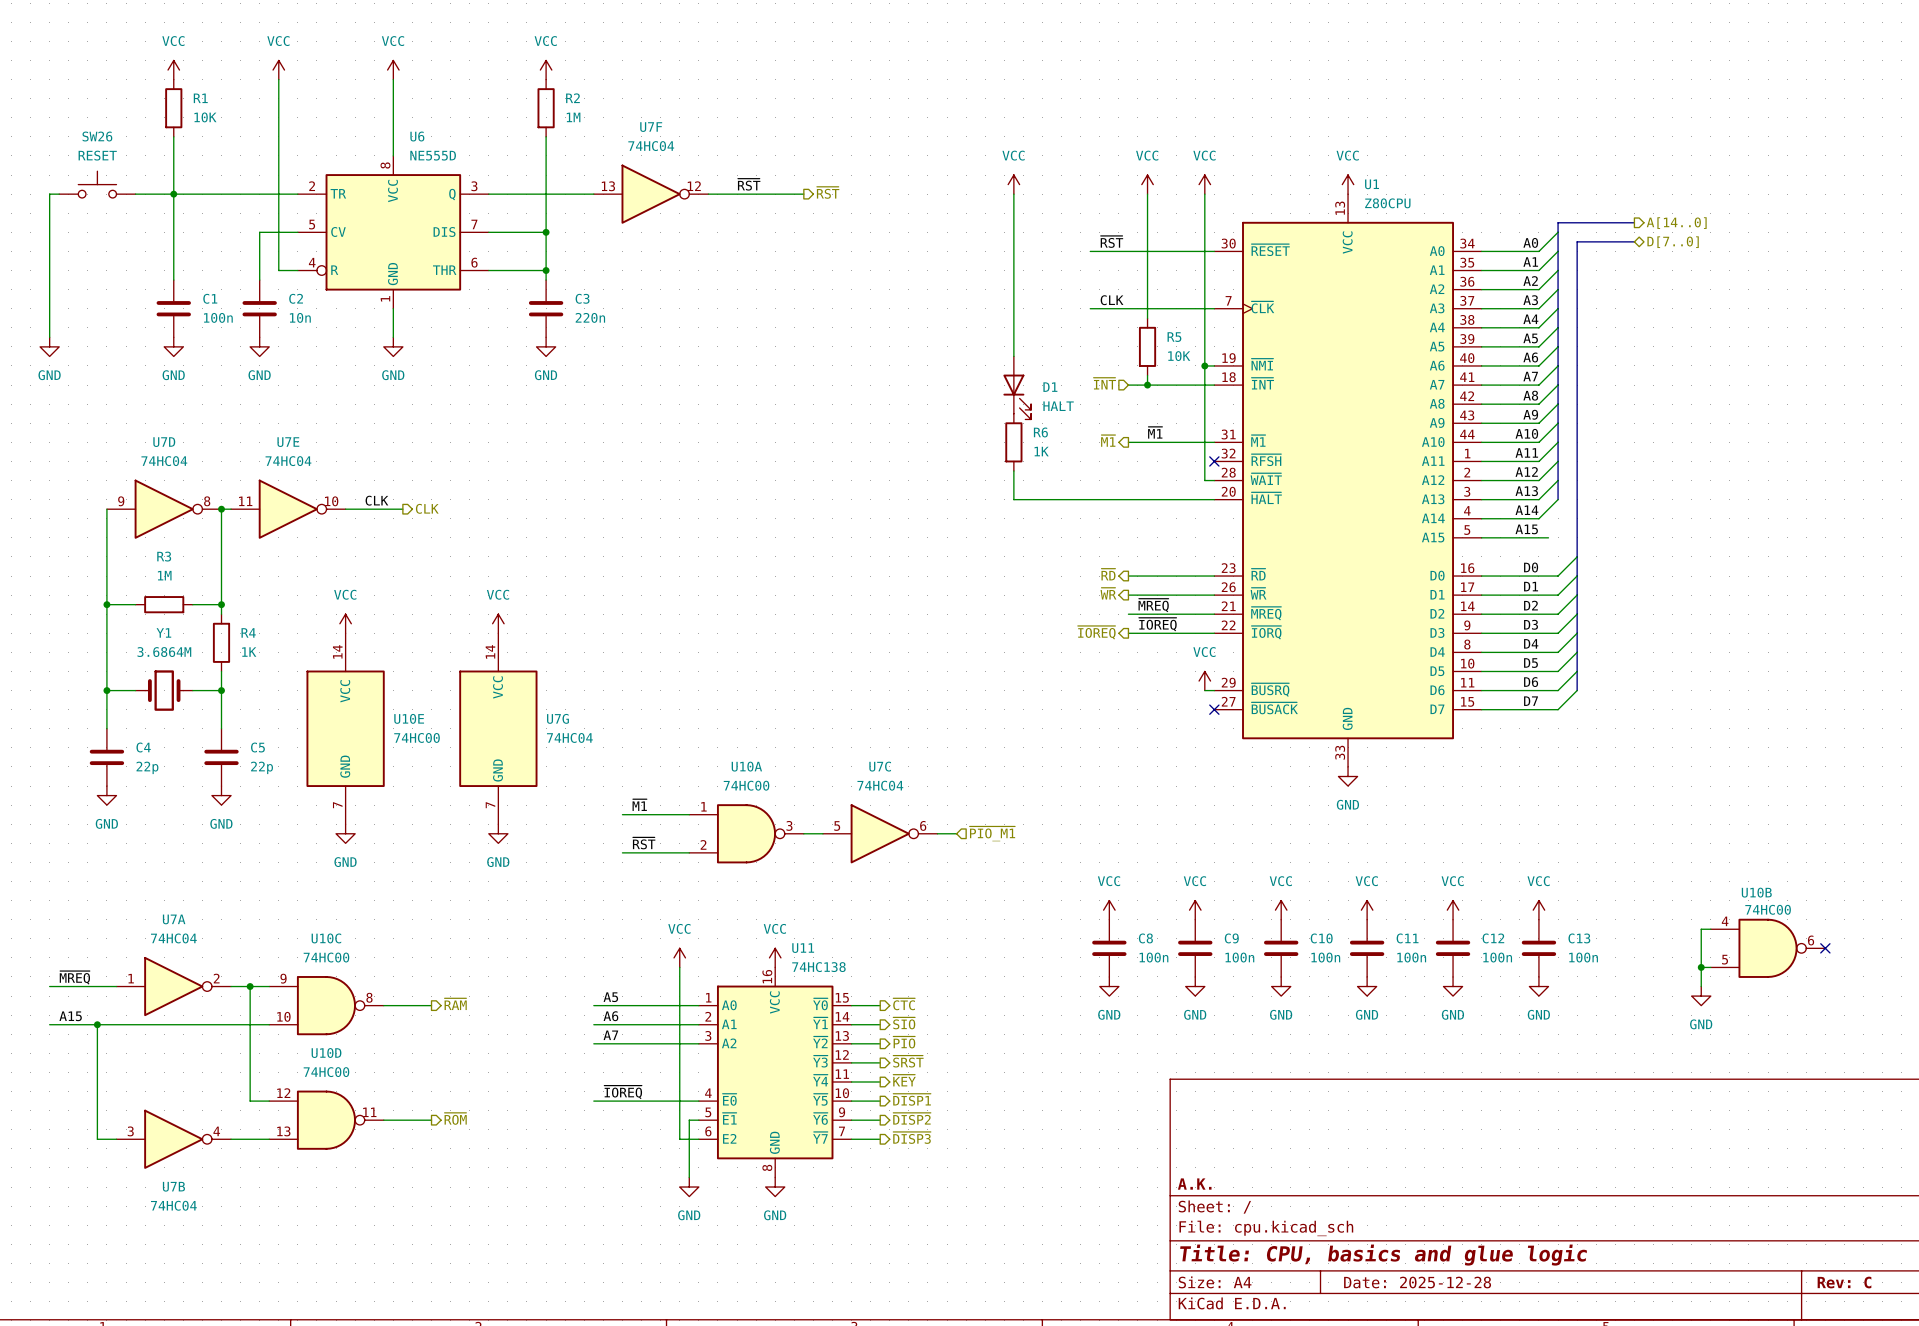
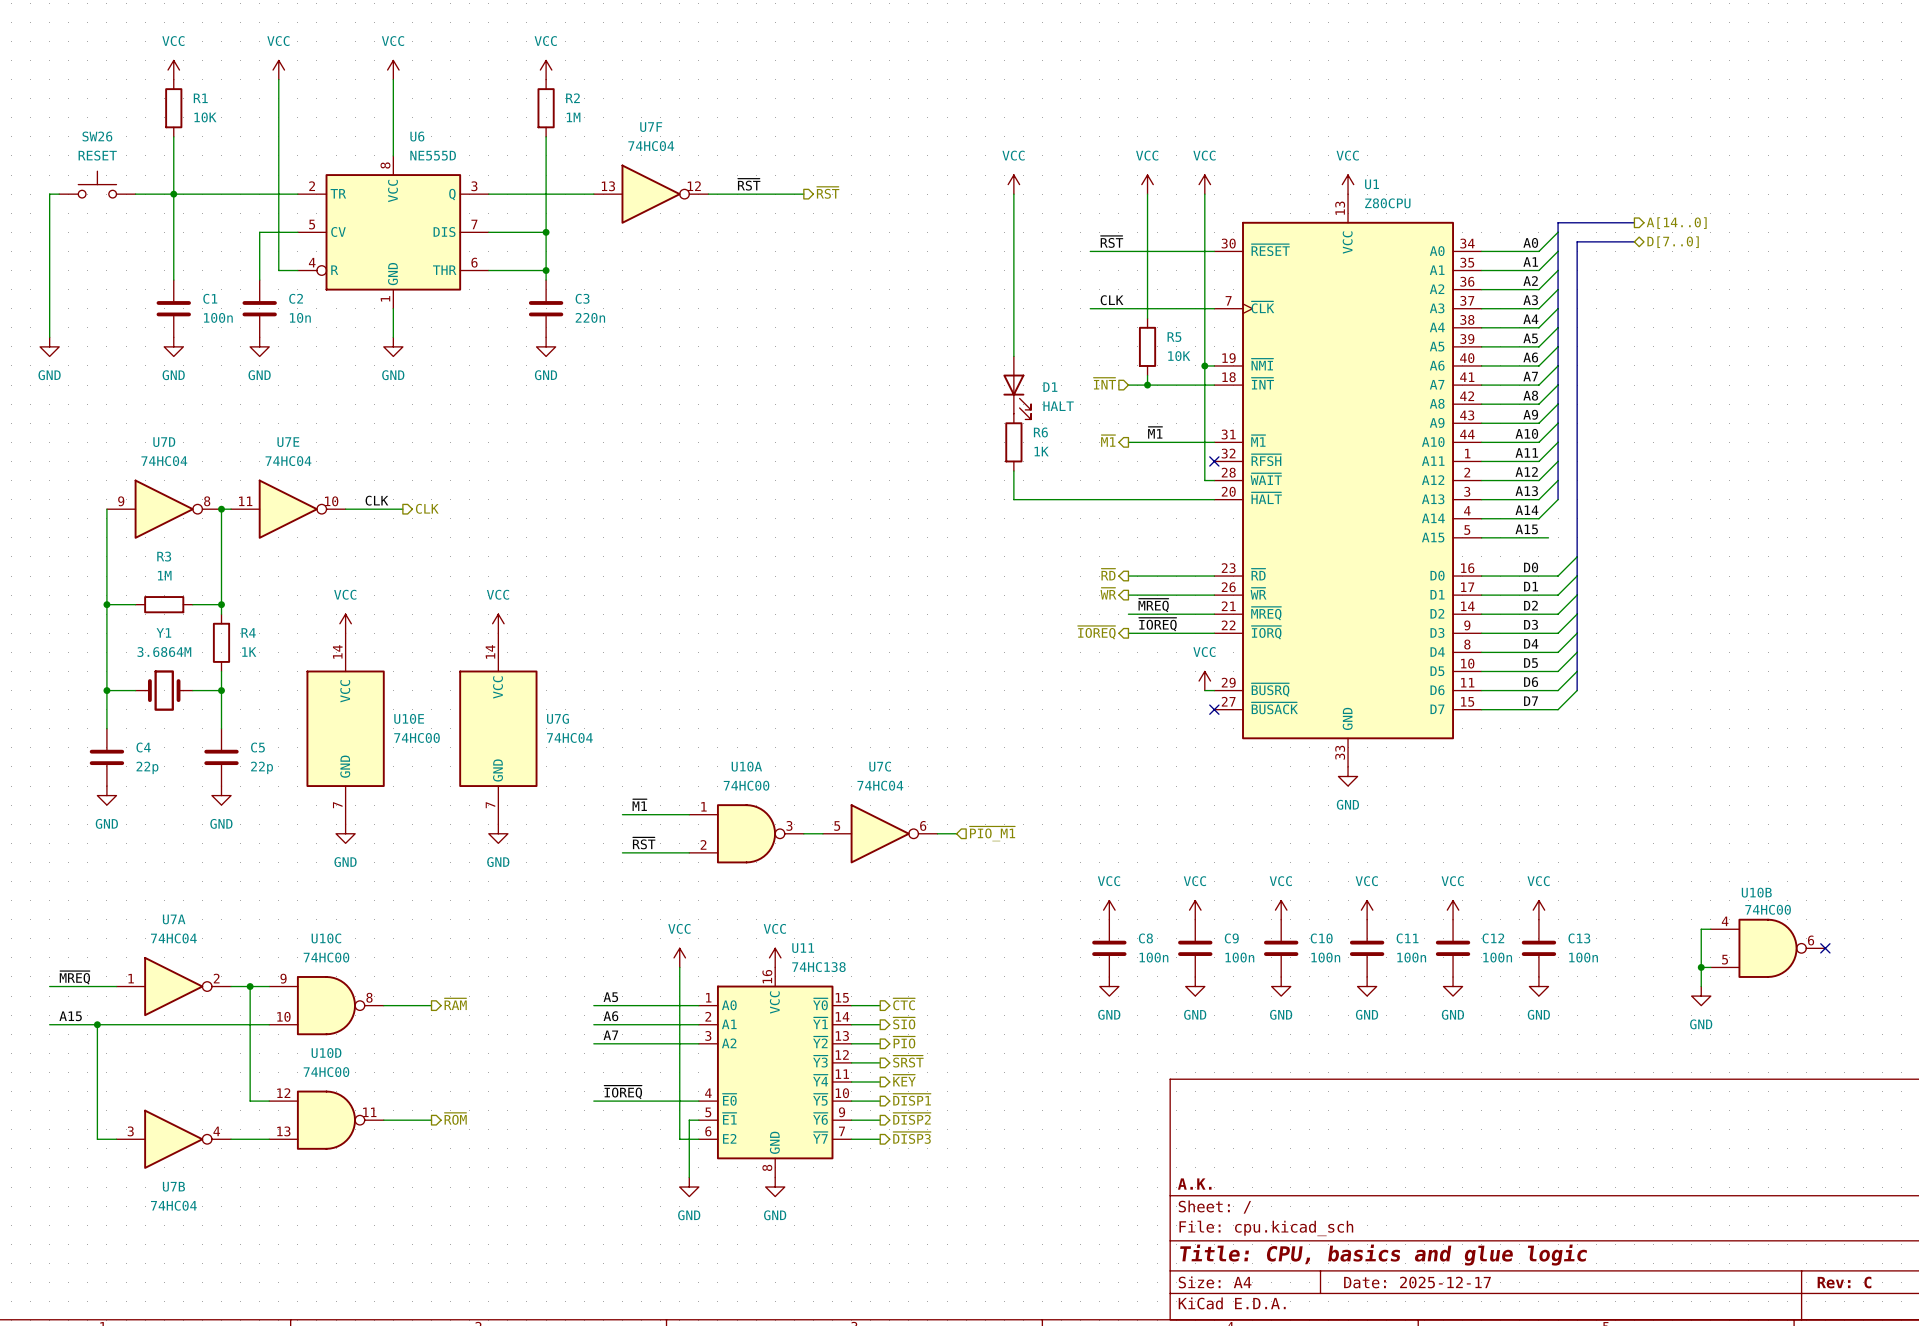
title block: Date: 2025-12-28 (1417, 1282) -> Date: 2025-12-17 (1417, 1282)

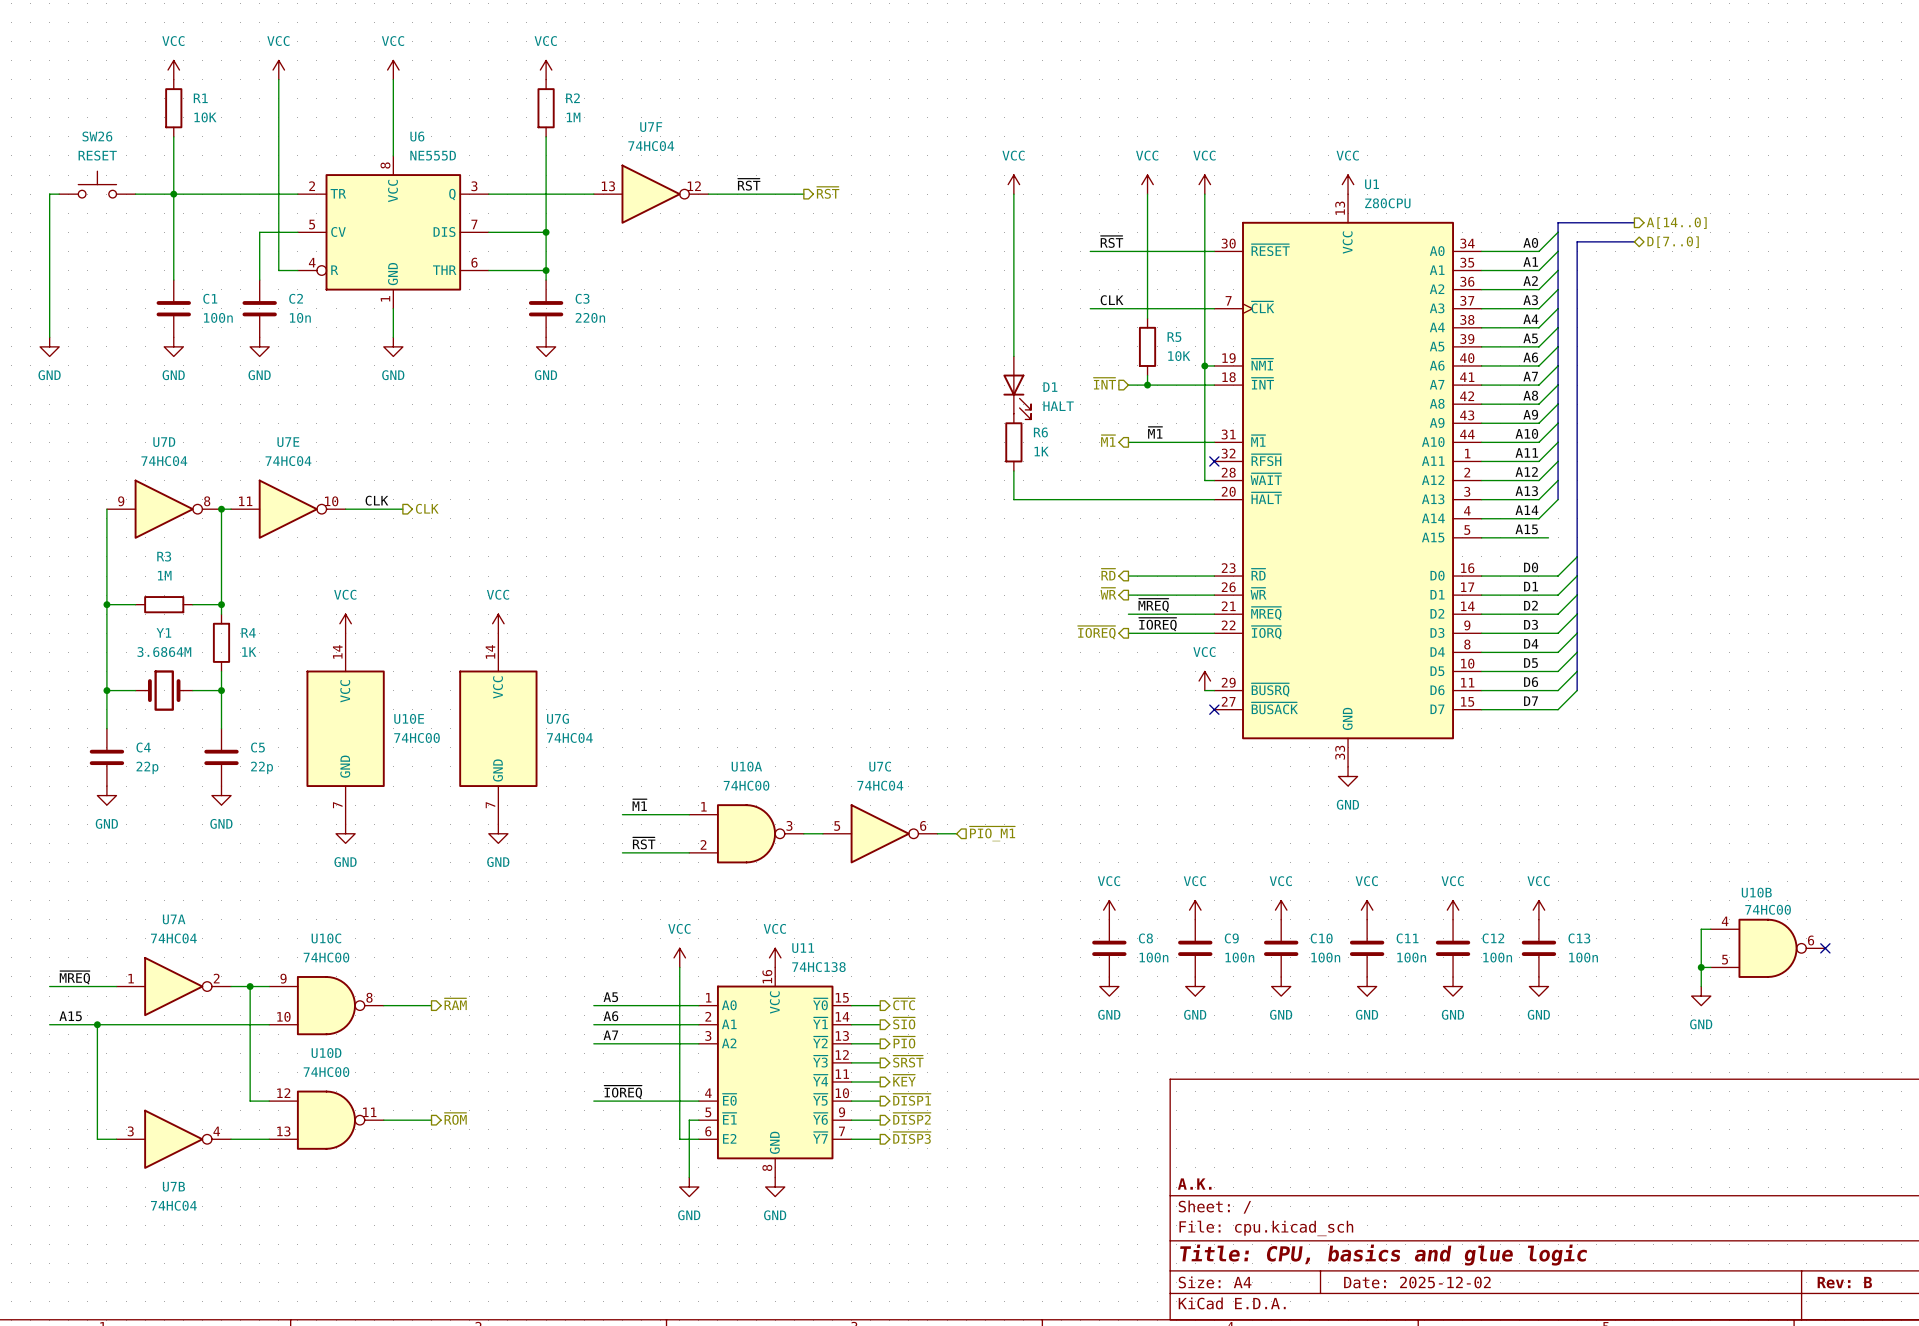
title block: Date: 2025-12-17 (1417, 1282) -> Date: 2025-12-02 (1417, 1282)
title block: Rev: C (1844, 1282) -> Rev: B (1844, 1282)

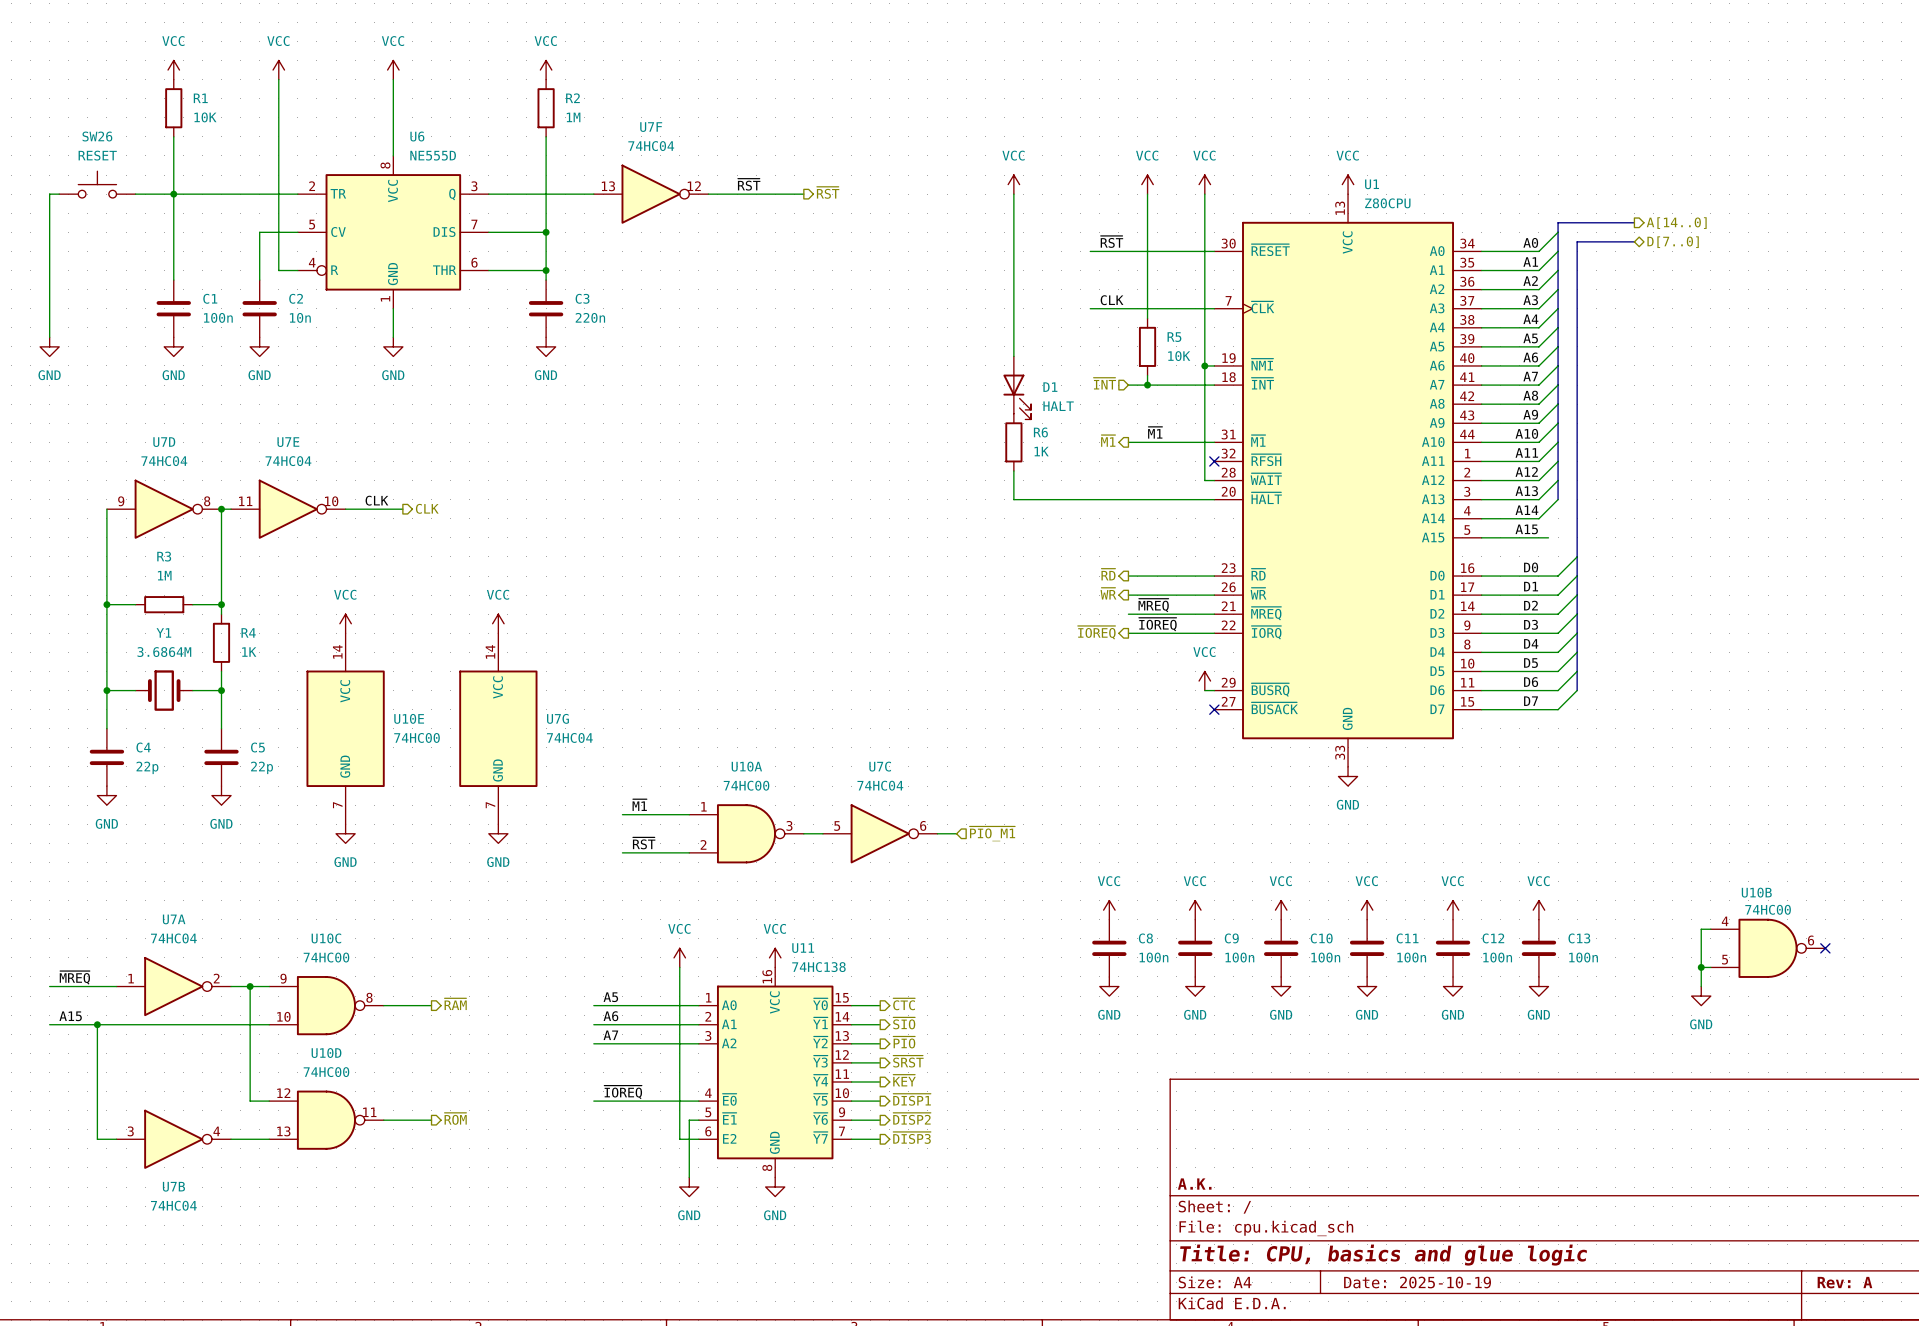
title block: Date: 2025-12-02 (1417, 1282) -> Date: 2025-10-19 (1417, 1282)
title block: Rev: B (1844, 1282) -> Rev: A (1844, 1282)

